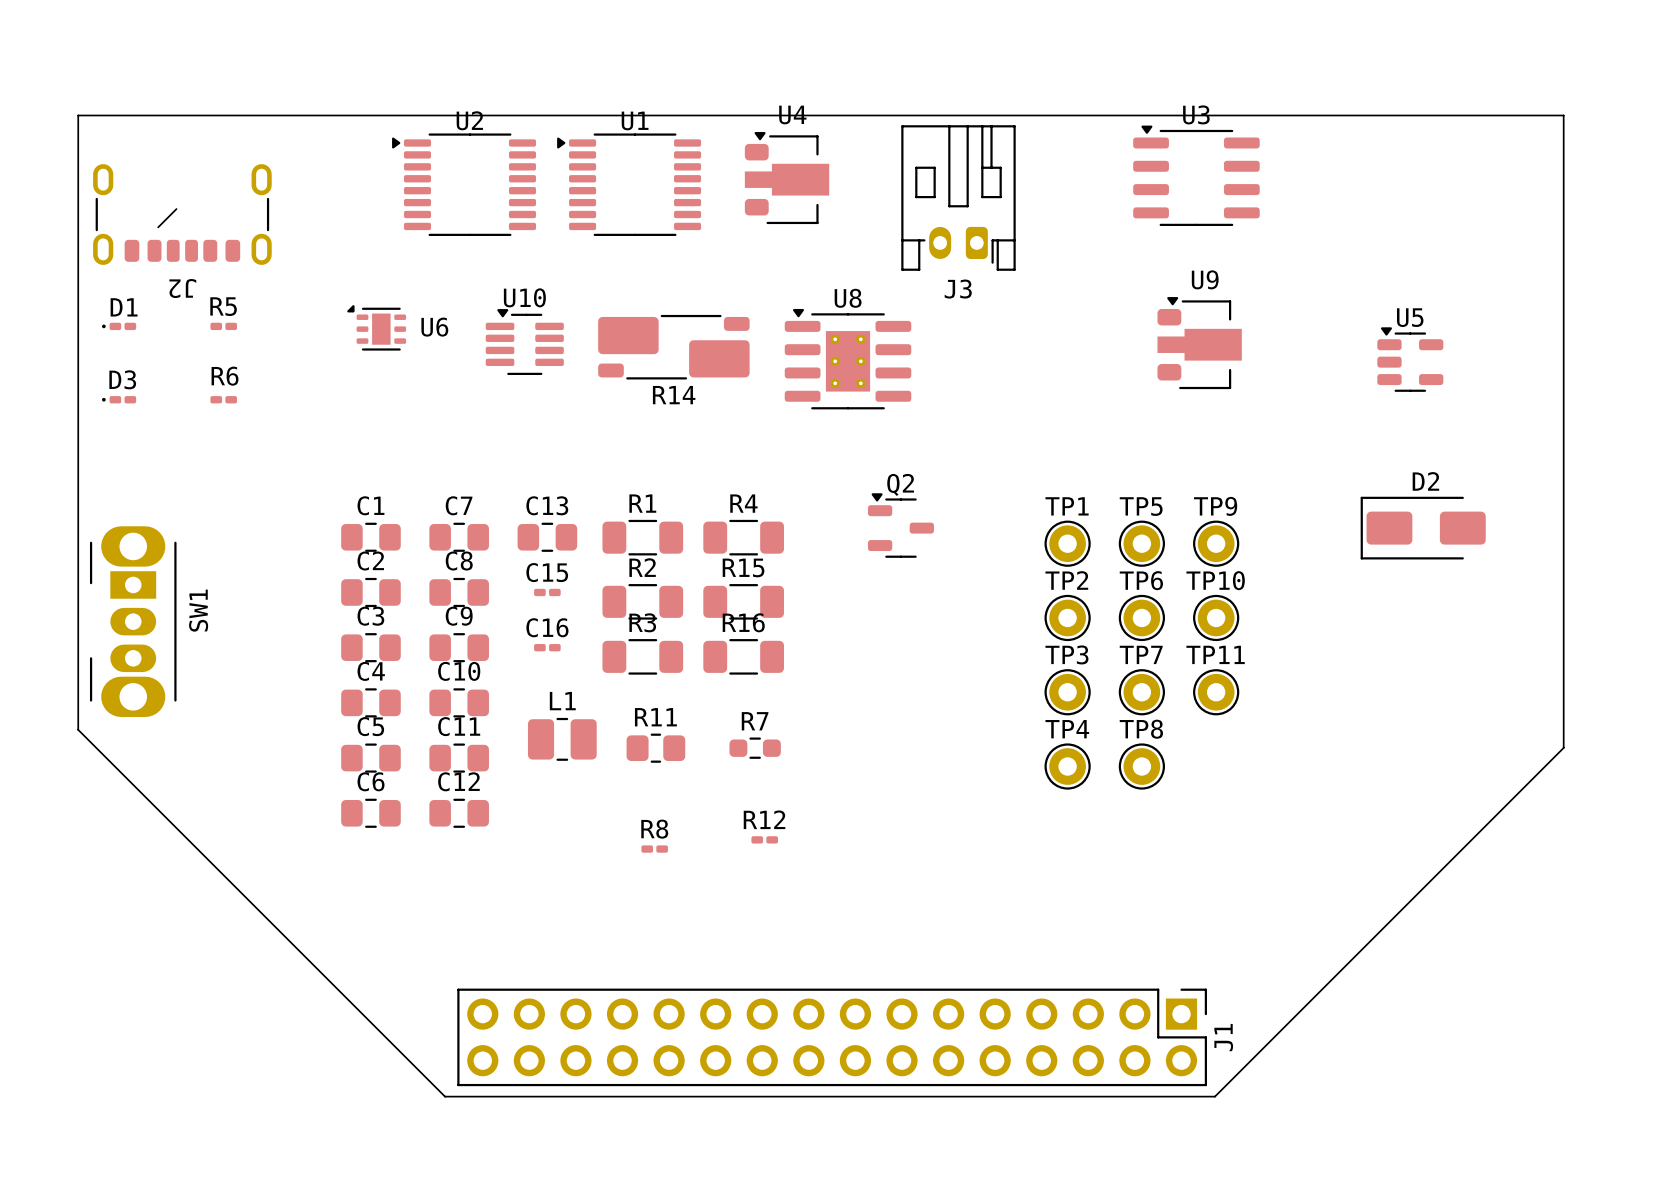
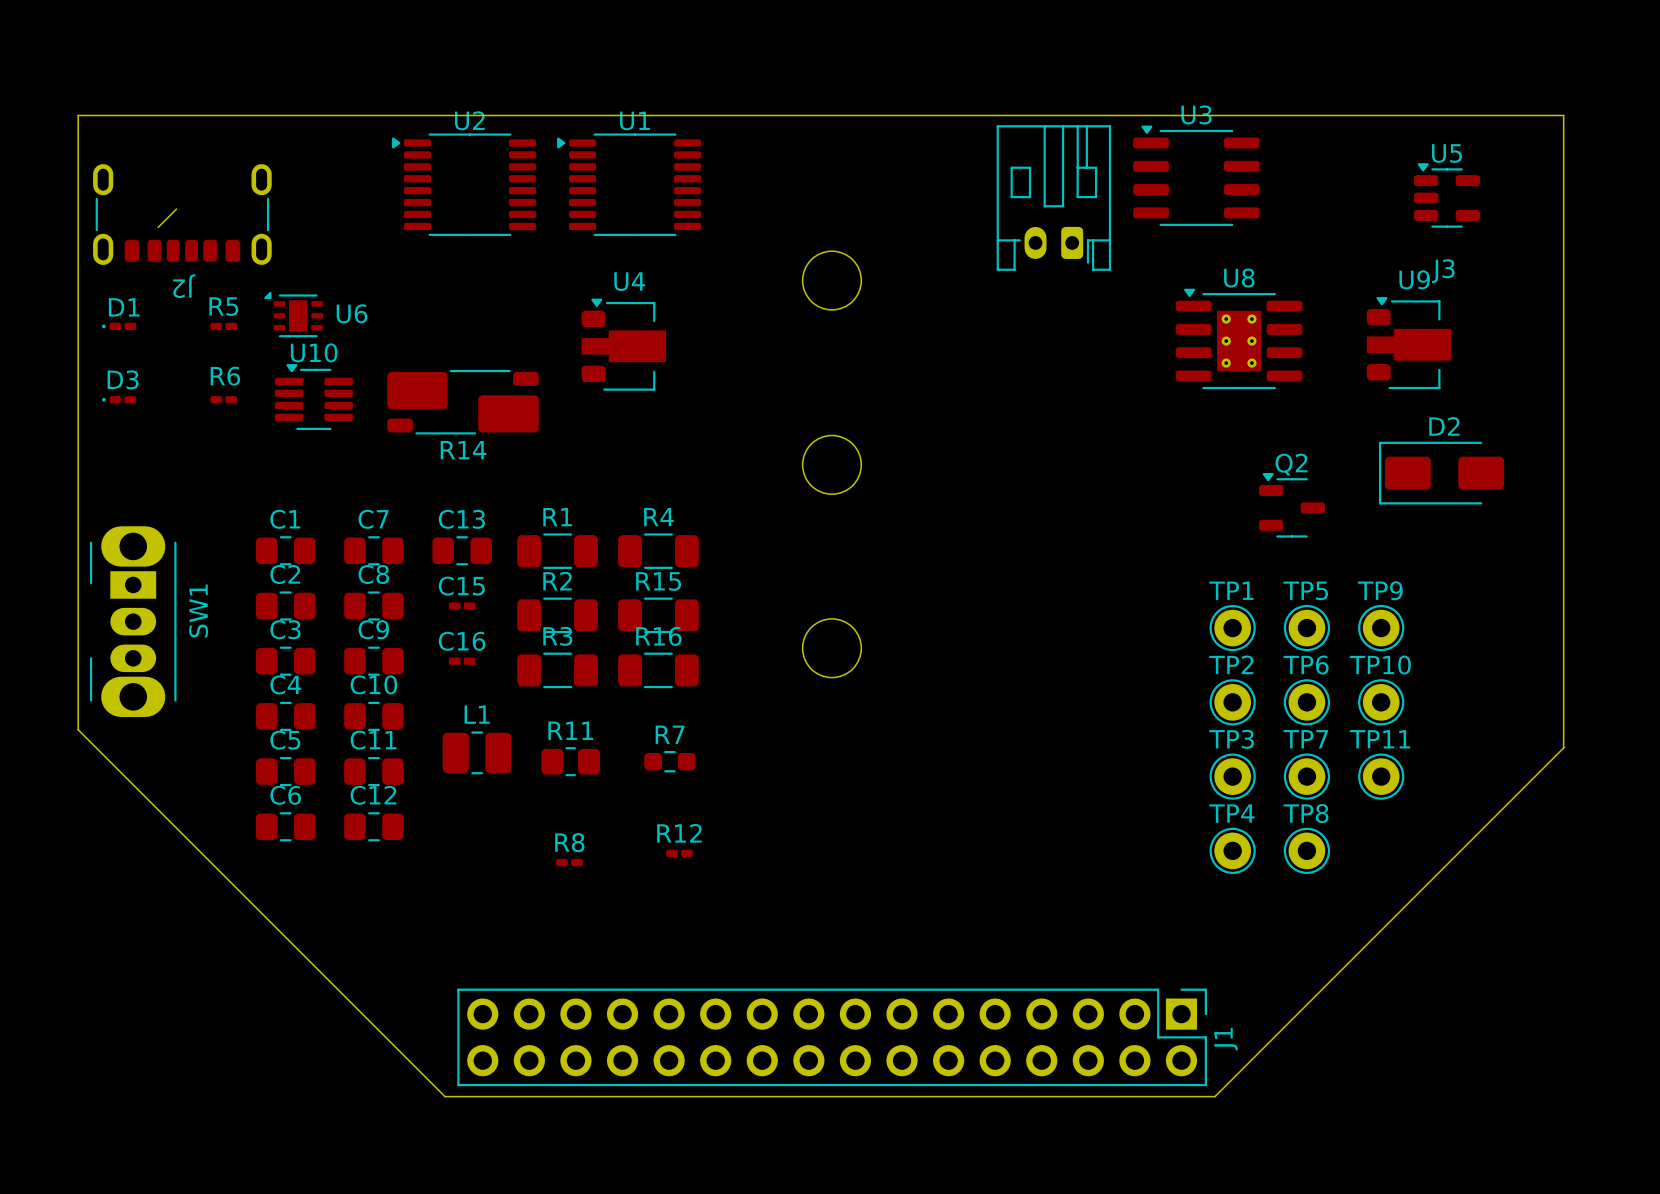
U4 position: (787, 178) -> (623, 344)
J3 position: (958, 198) -> (1053, 198)
round board edge: none -> [802, 250, 862, 311]
J3 name position: J3 (958, 289) -> J3 (1443, 271)
U6 position: (376, 327) -> (293, 314)
U10 position: (524, 342) -> (313, 397)
U9 position: (1199, 343) -> (1408, 343)
R14 position: (673, 347) -> (462, 402)
U8 position: (848, 359) -> (1239, 338)
U5 position: (1410, 359) -> (1446, 195)
round board edge: none -> [802, 435, 862, 495]
Q2 position: (900, 525) -> (1292, 505)
D2 position: (1423, 528) -> (1441, 473)
C1 position: (370, 537) -> (285, 550)
C7 position: (459, 537) -> (373, 550)
C13 position: (547, 537) -> (462, 550)
R1 position: (642, 537) -> (557, 551)
R4 position: (743, 537) -> (658, 551)
TP1 position: (1067, 543) -> (1232, 628)
TP5 position: (1141, 543) -> (1306, 628)
TP9 position: (1216, 543) -> (1381, 628)
C2 position: (370, 592) -> (285, 605)
C8 position: (459, 592) -> (373, 605)
C15 position: (547, 592) -> (462, 605)
R2 position: (642, 601) -> (557, 615)
R15 position: (743, 601) -> (658, 615)
TP2 position: (1067, 617) -> (1232, 702)
TP6 position: (1141, 617) -> (1306, 702)
TP10 position: (1216, 617) -> (1381, 702)
round board edge: none -> [802, 618, 862, 679]
C3 position: (370, 647) -> (285, 661)
C9 position: (459, 647) -> (373, 661)
C16 position: (547, 647) -> (462, 661)
R3 position: (642, 656) -> (557, 670)
R16 position: (743, 656) -> (658, 670)
TP3 position: (1067, 692) -> (1232, 776)
TP7 position: (1141, 692) -> (1306, 776)
TP11 position: (1216, 692) -> (1381, 776)
C4 position: (370, 702) -> (285, 716)
C10 position: (459, 702) -> (373, 716)
L1 position: (562, 739) -> (477, 752)
R11 position: (655, 748) -> (570, 761)
R7 position: (755, 748) -> (669, 761)
C5 position: (370, 758) -> (285, 771)
C11 position: (459, 758) -> (373, 771)
TP4 position: (1067, 766) -> (1232, 850)
TP8 position: (1141, 766) -> (1306, 850)
C6 position: (370, 813) -> (285, 826)
C12 position: (459, 813) -> (373, 826)
R12 position: (764, 839) -> (679, 853)
R8 position: (654, 849) -> (569, 862)

